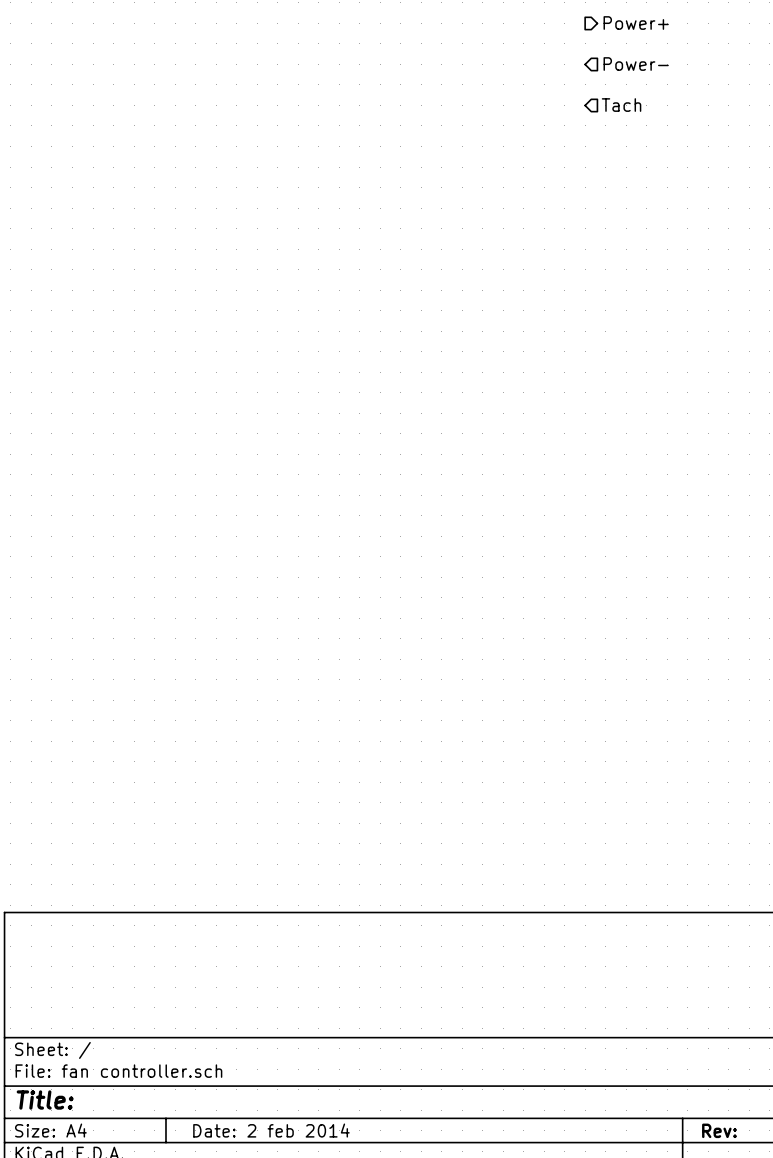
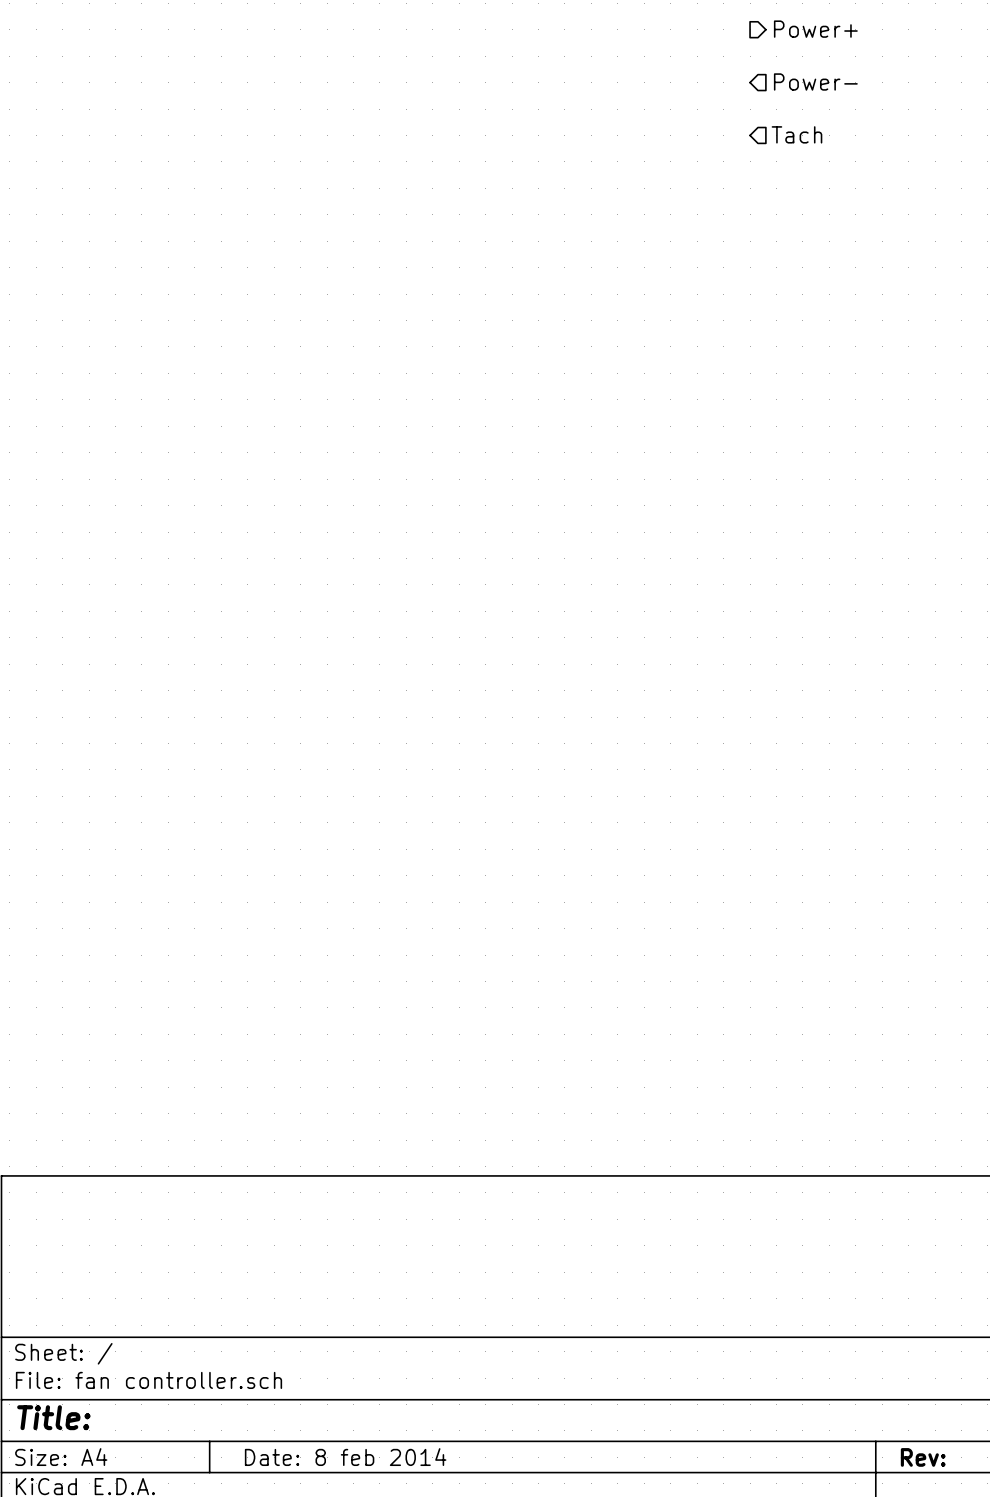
title block: Date: 2 feb 2014 (271, 1130) -> Date: 8 feb 2014 (345, 1457)

